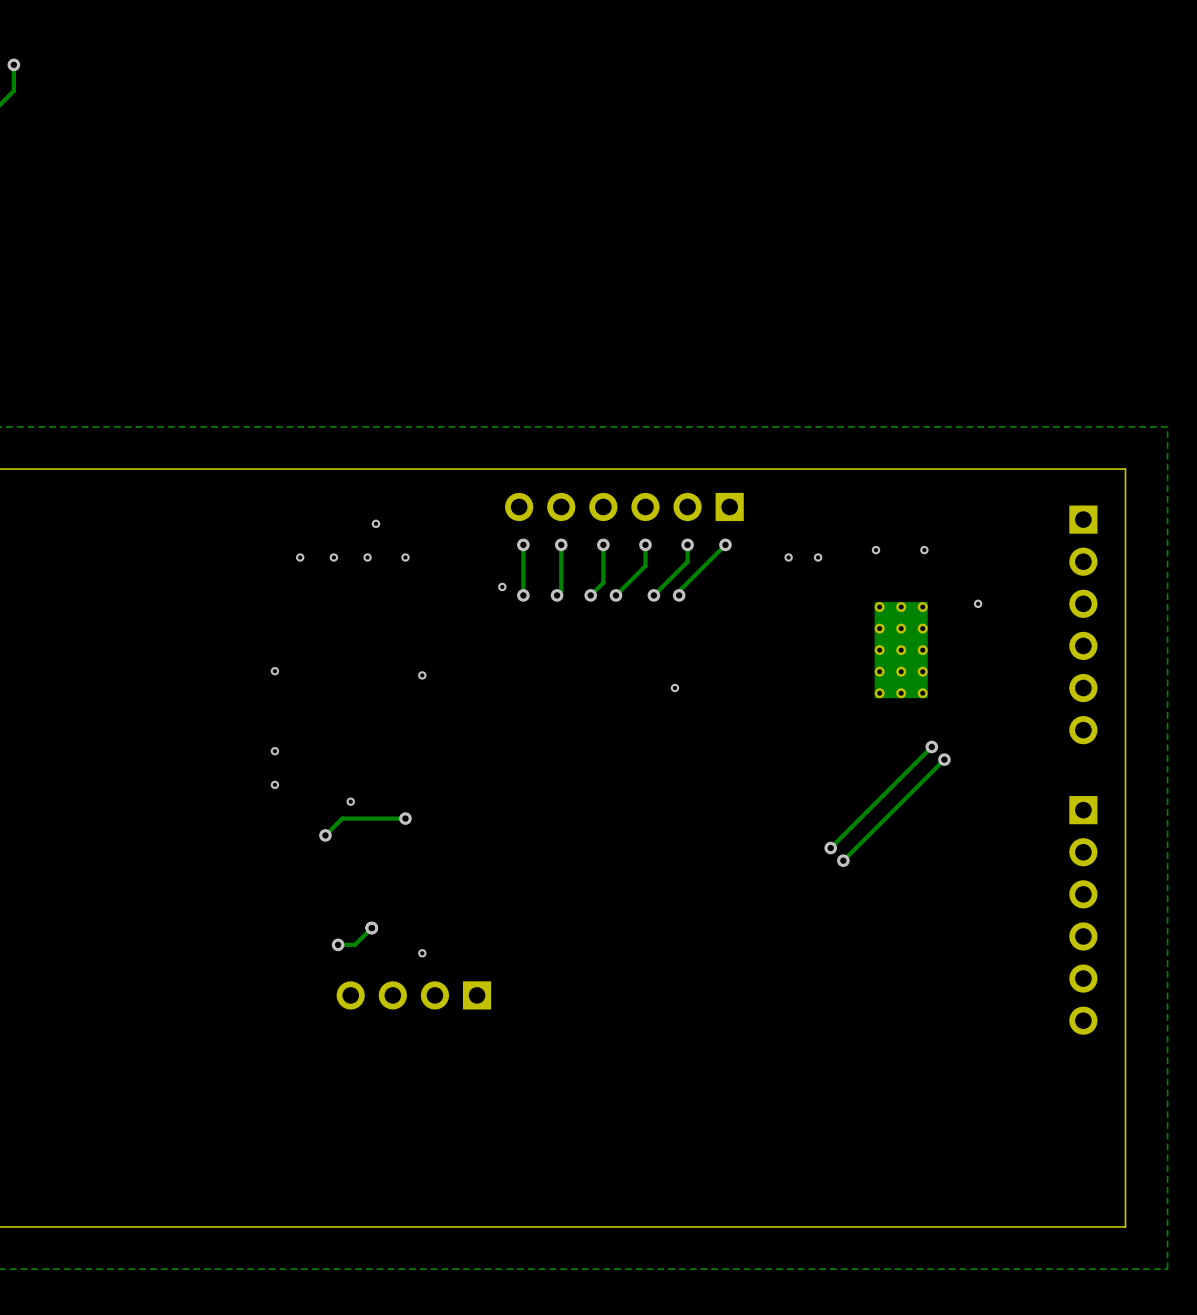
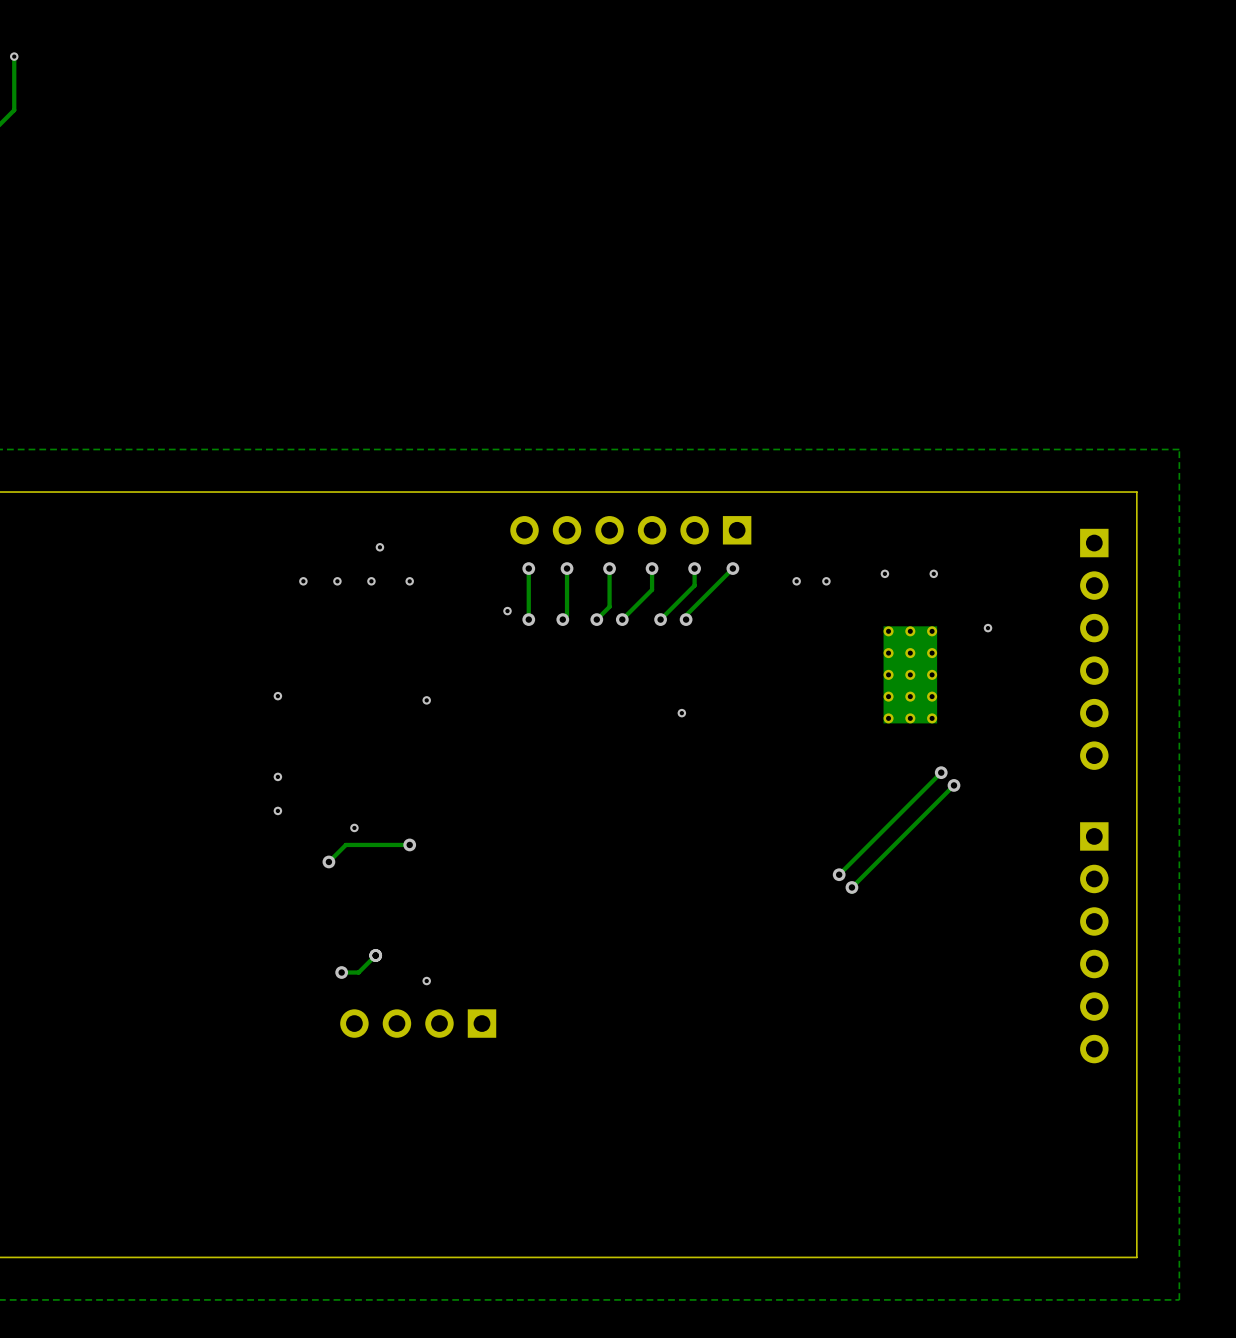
track: none -> (14, 56) (14, 83)
via: none -> (14, 56)
via: (13, 64) -> none

